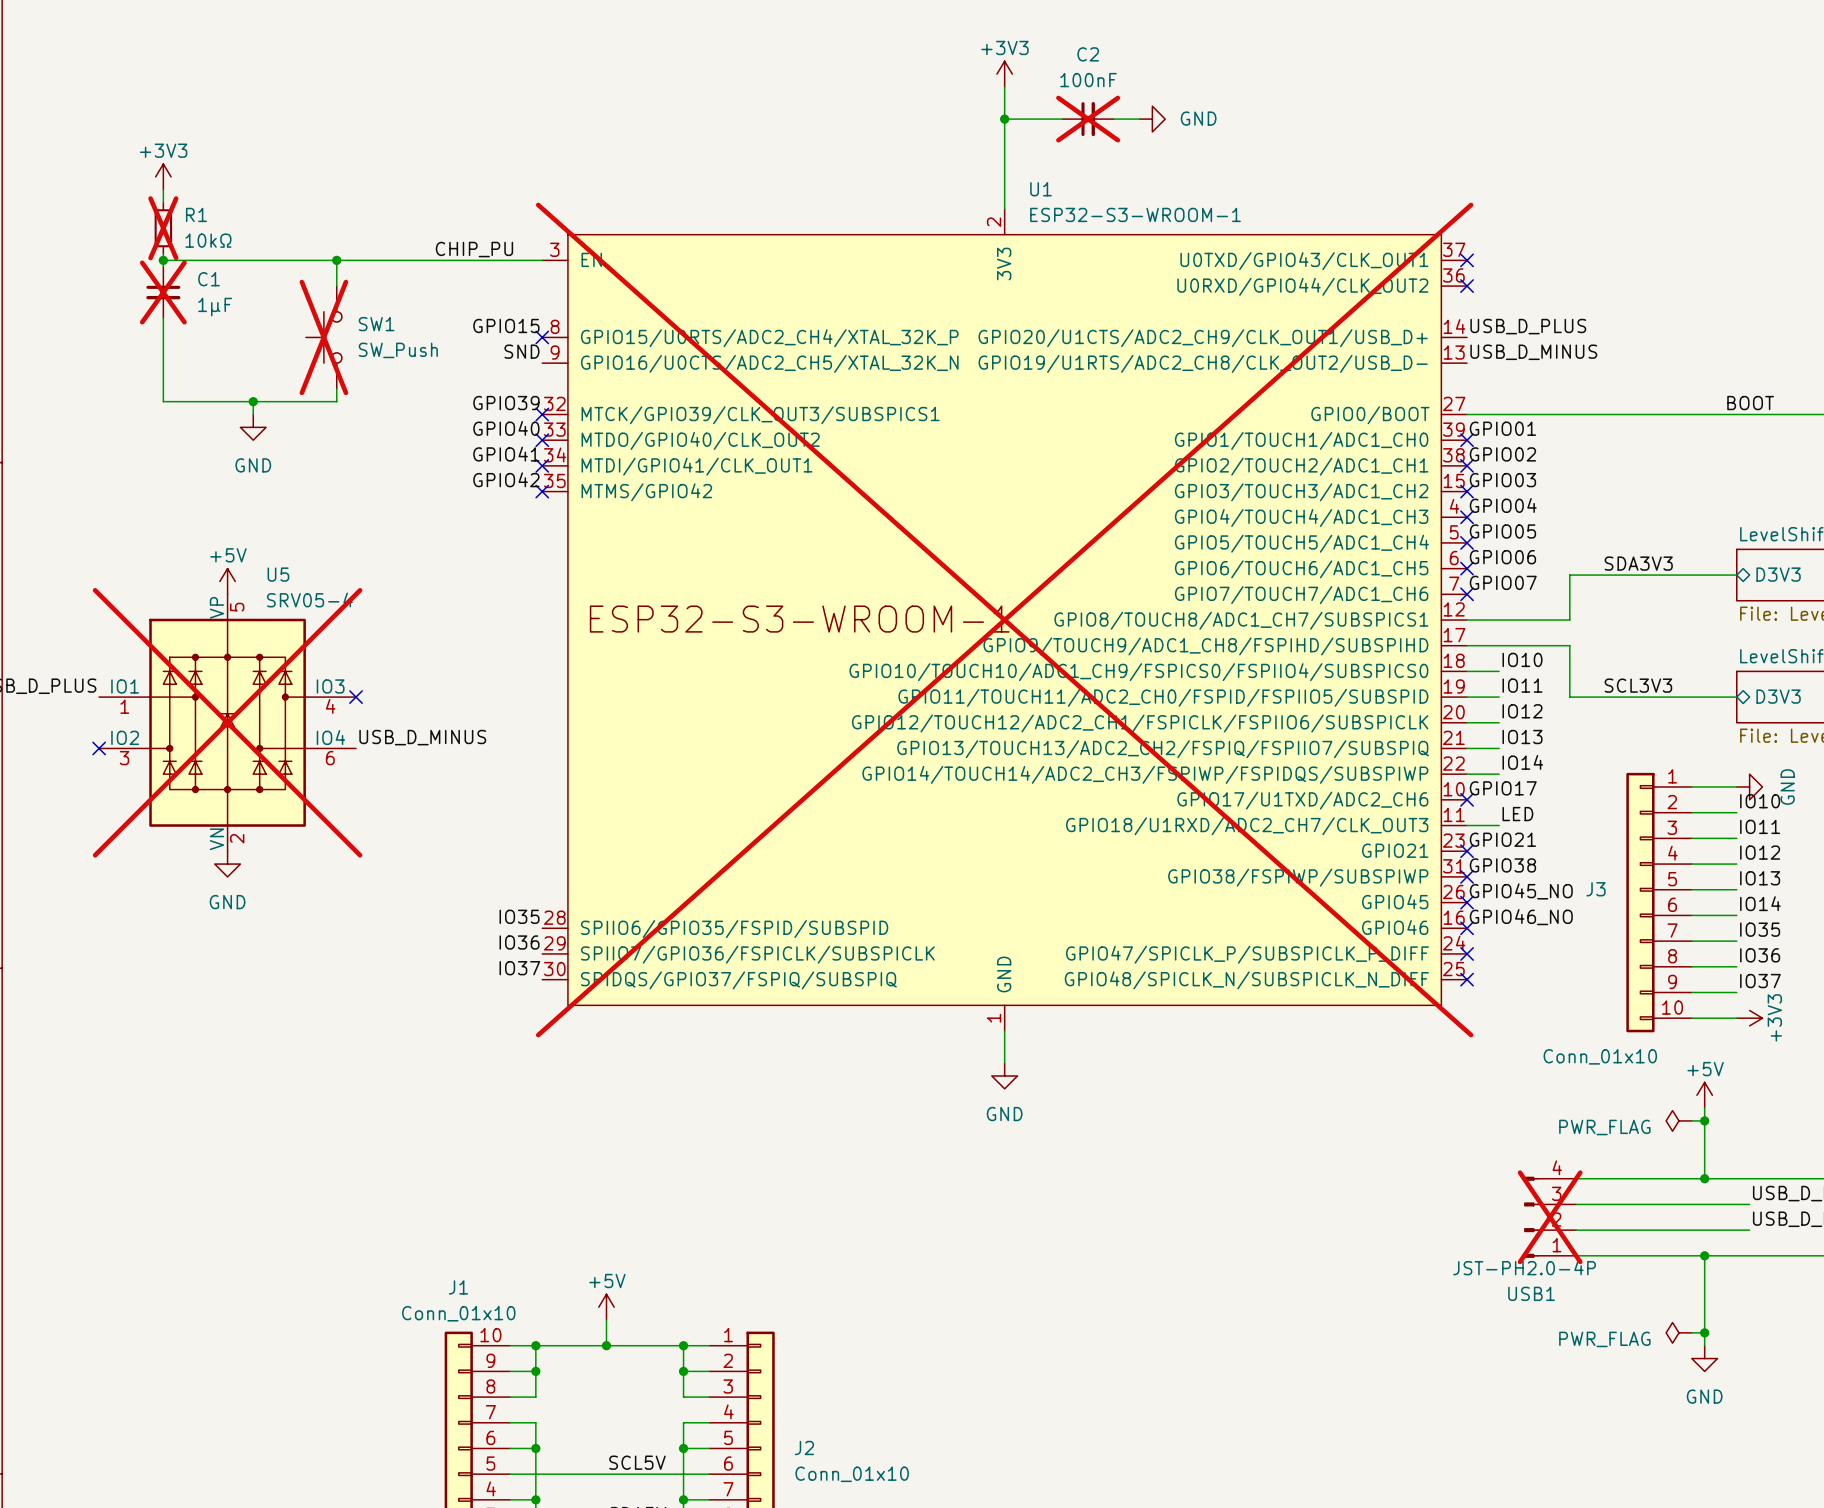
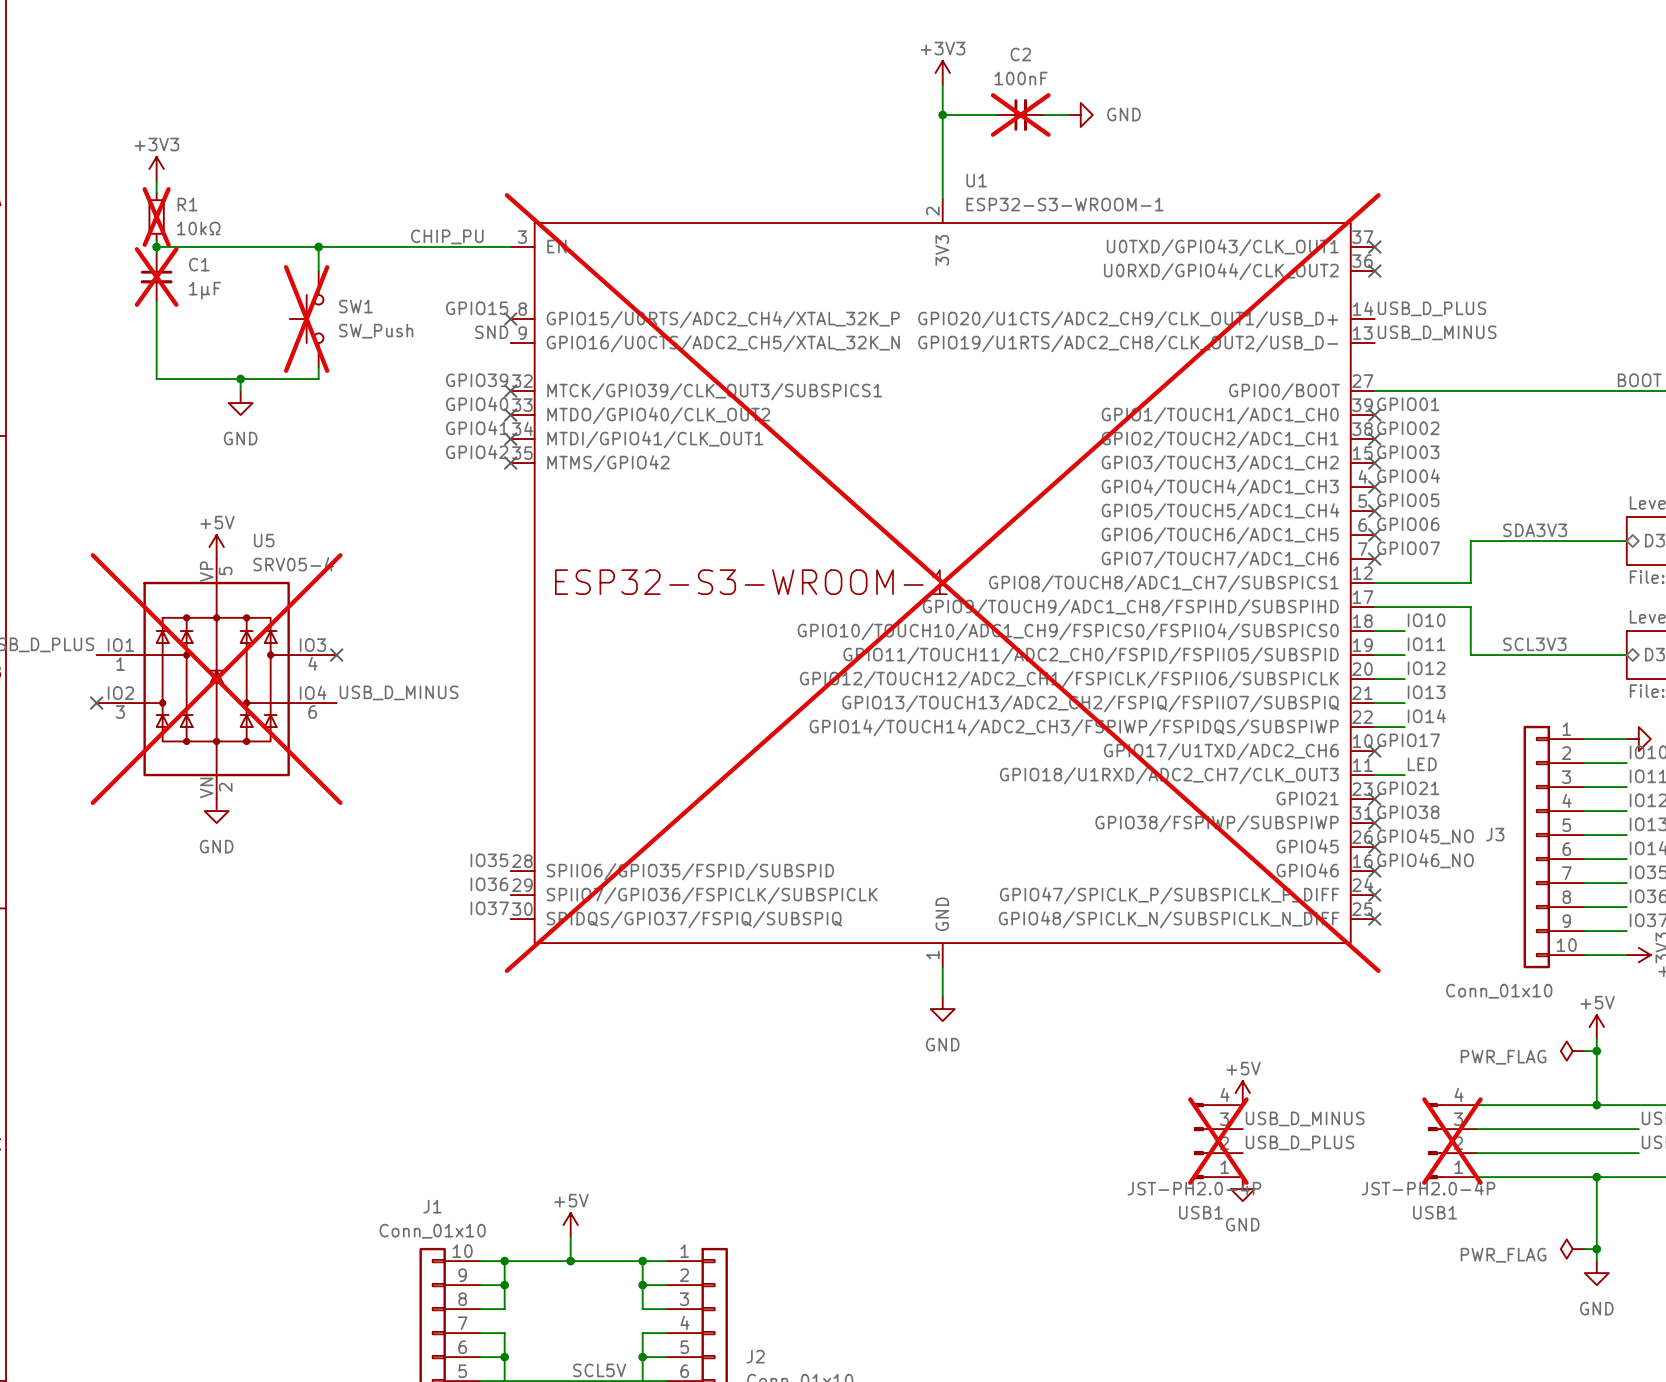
power symbol: none -> +5V (1242, 1093)
label: none -> USB_D_MINUS (1305, 1118)
USB1: none -> JST-PH2.0-4P (1218, 1141)
label: none -> USB_D_PLUS (1299, 1142)
power symbol: none -> GND (1242, 1189)

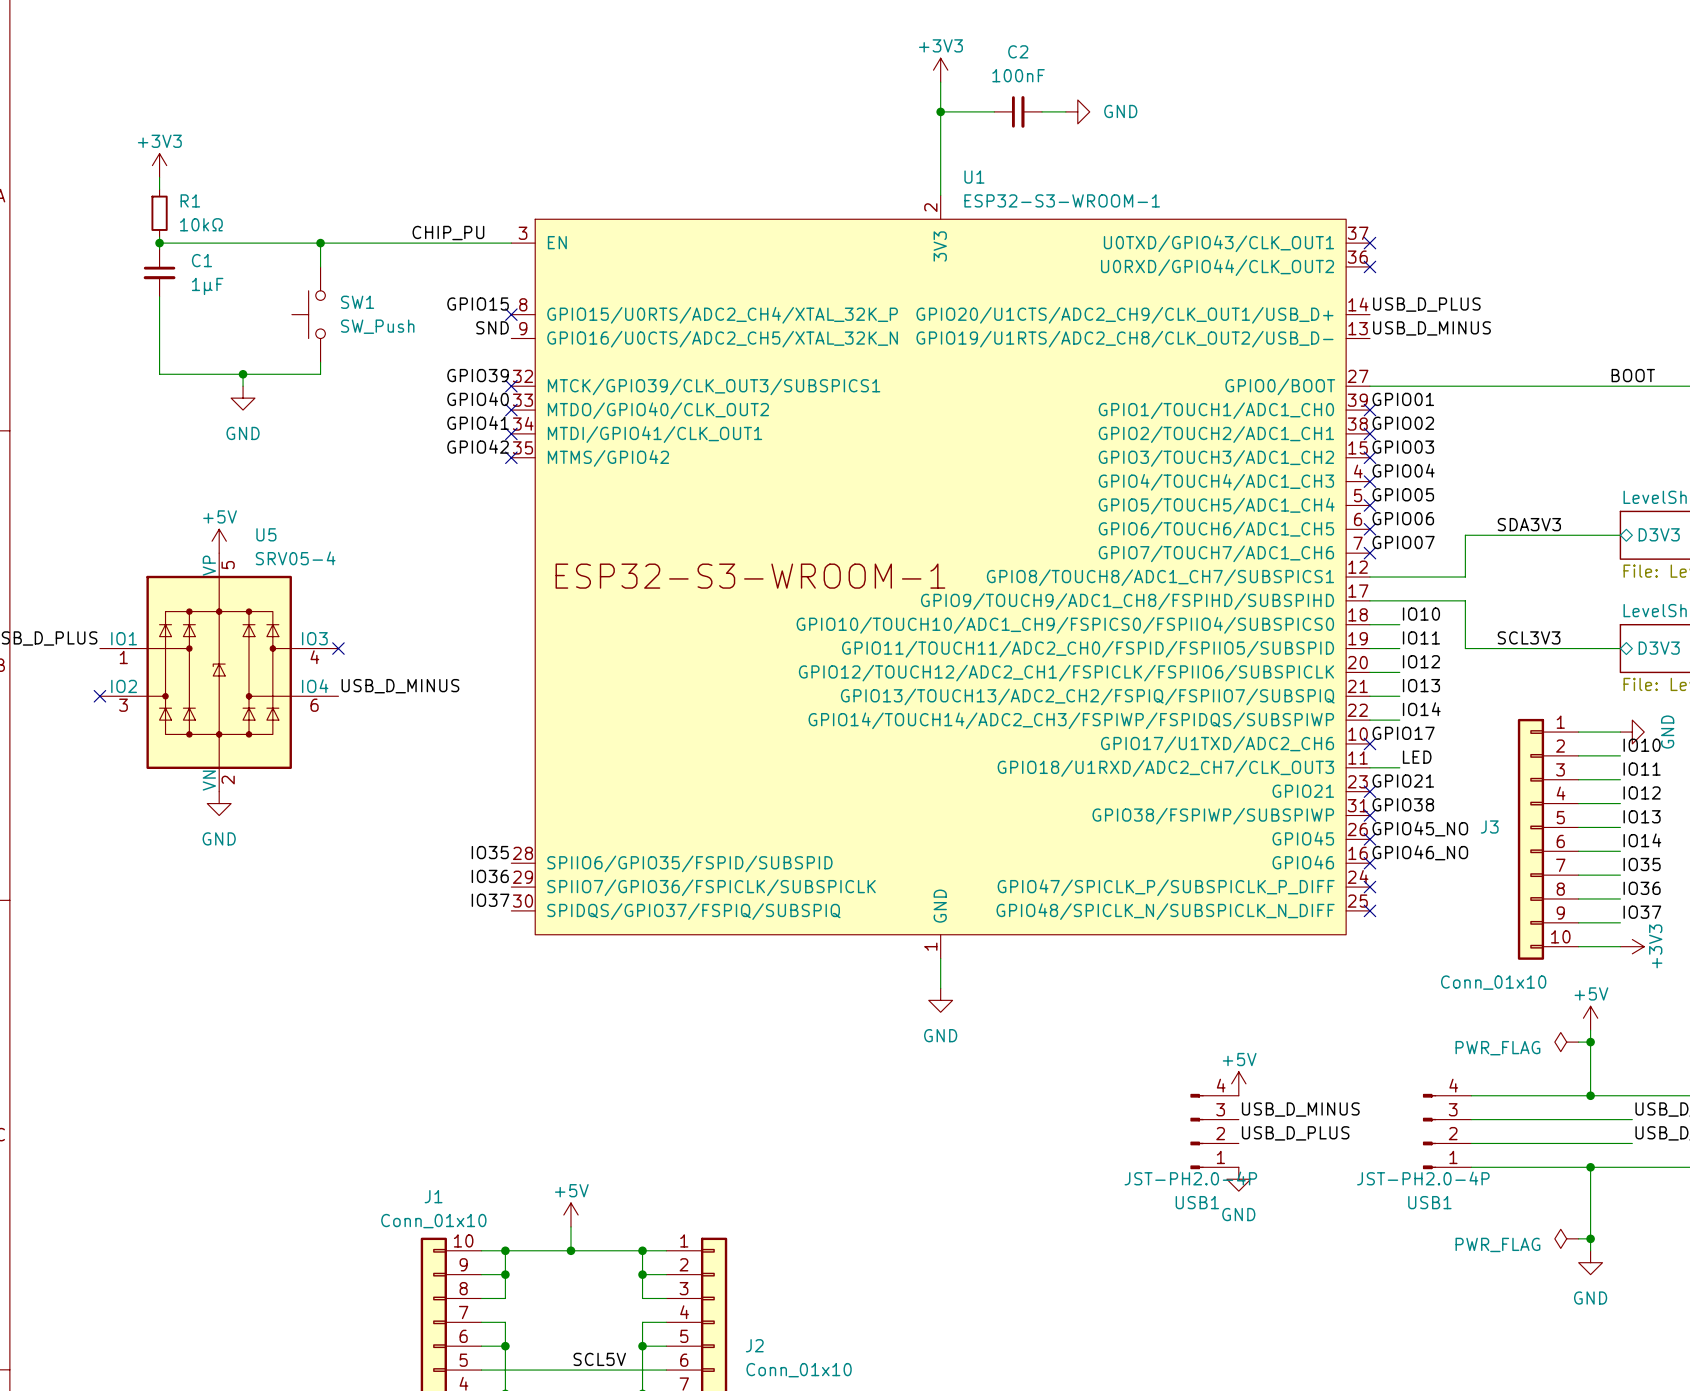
C2 do-not-place cross: (1020, 114) -> none
R1 do-not-place cross: (156, 216) -> none
C1 do-not-place cross: (156, 277) -> none
SW1 do-not-place cross: (306, 319) -> none
U1 do-not-place cross: (942, 583) -> none
U5 do-not-place cross: (216, 679) -> none
USB1 do-not-place cross: (1218, 1141) -> none
USB1 do-not-place cross: (1452, 1141) -> none

